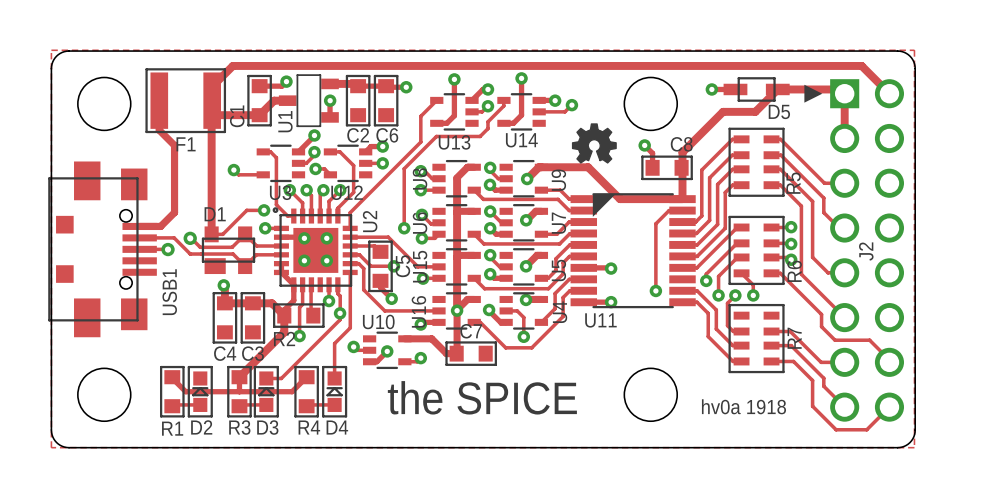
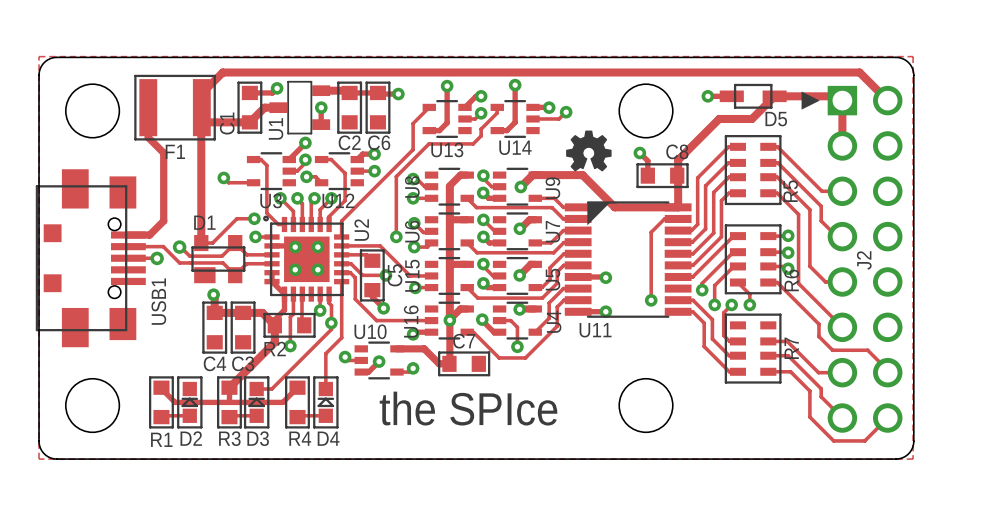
text: the SPICE (482, 397) -> the SPIce (468, 408)
text: hv0a 1918 (743, 406) -> none

